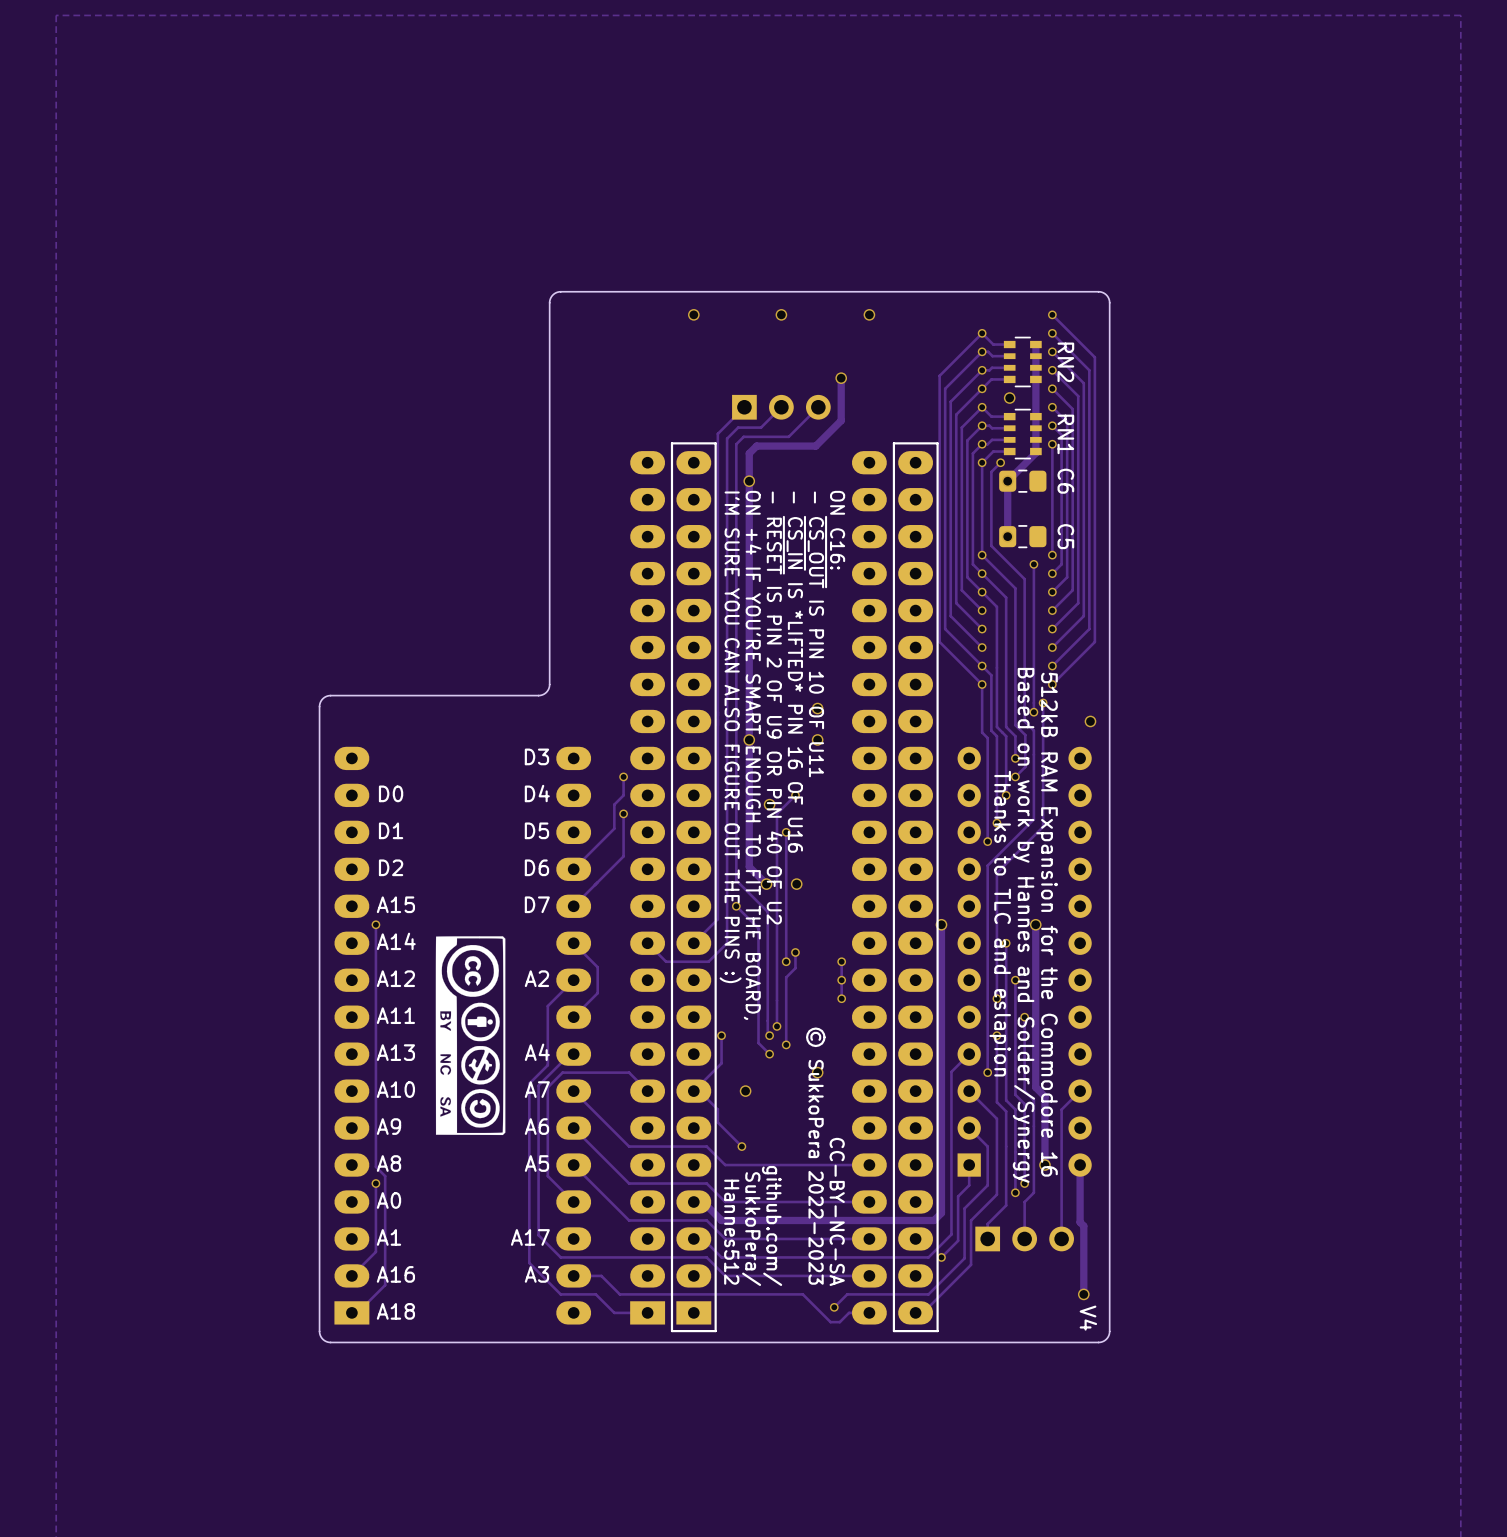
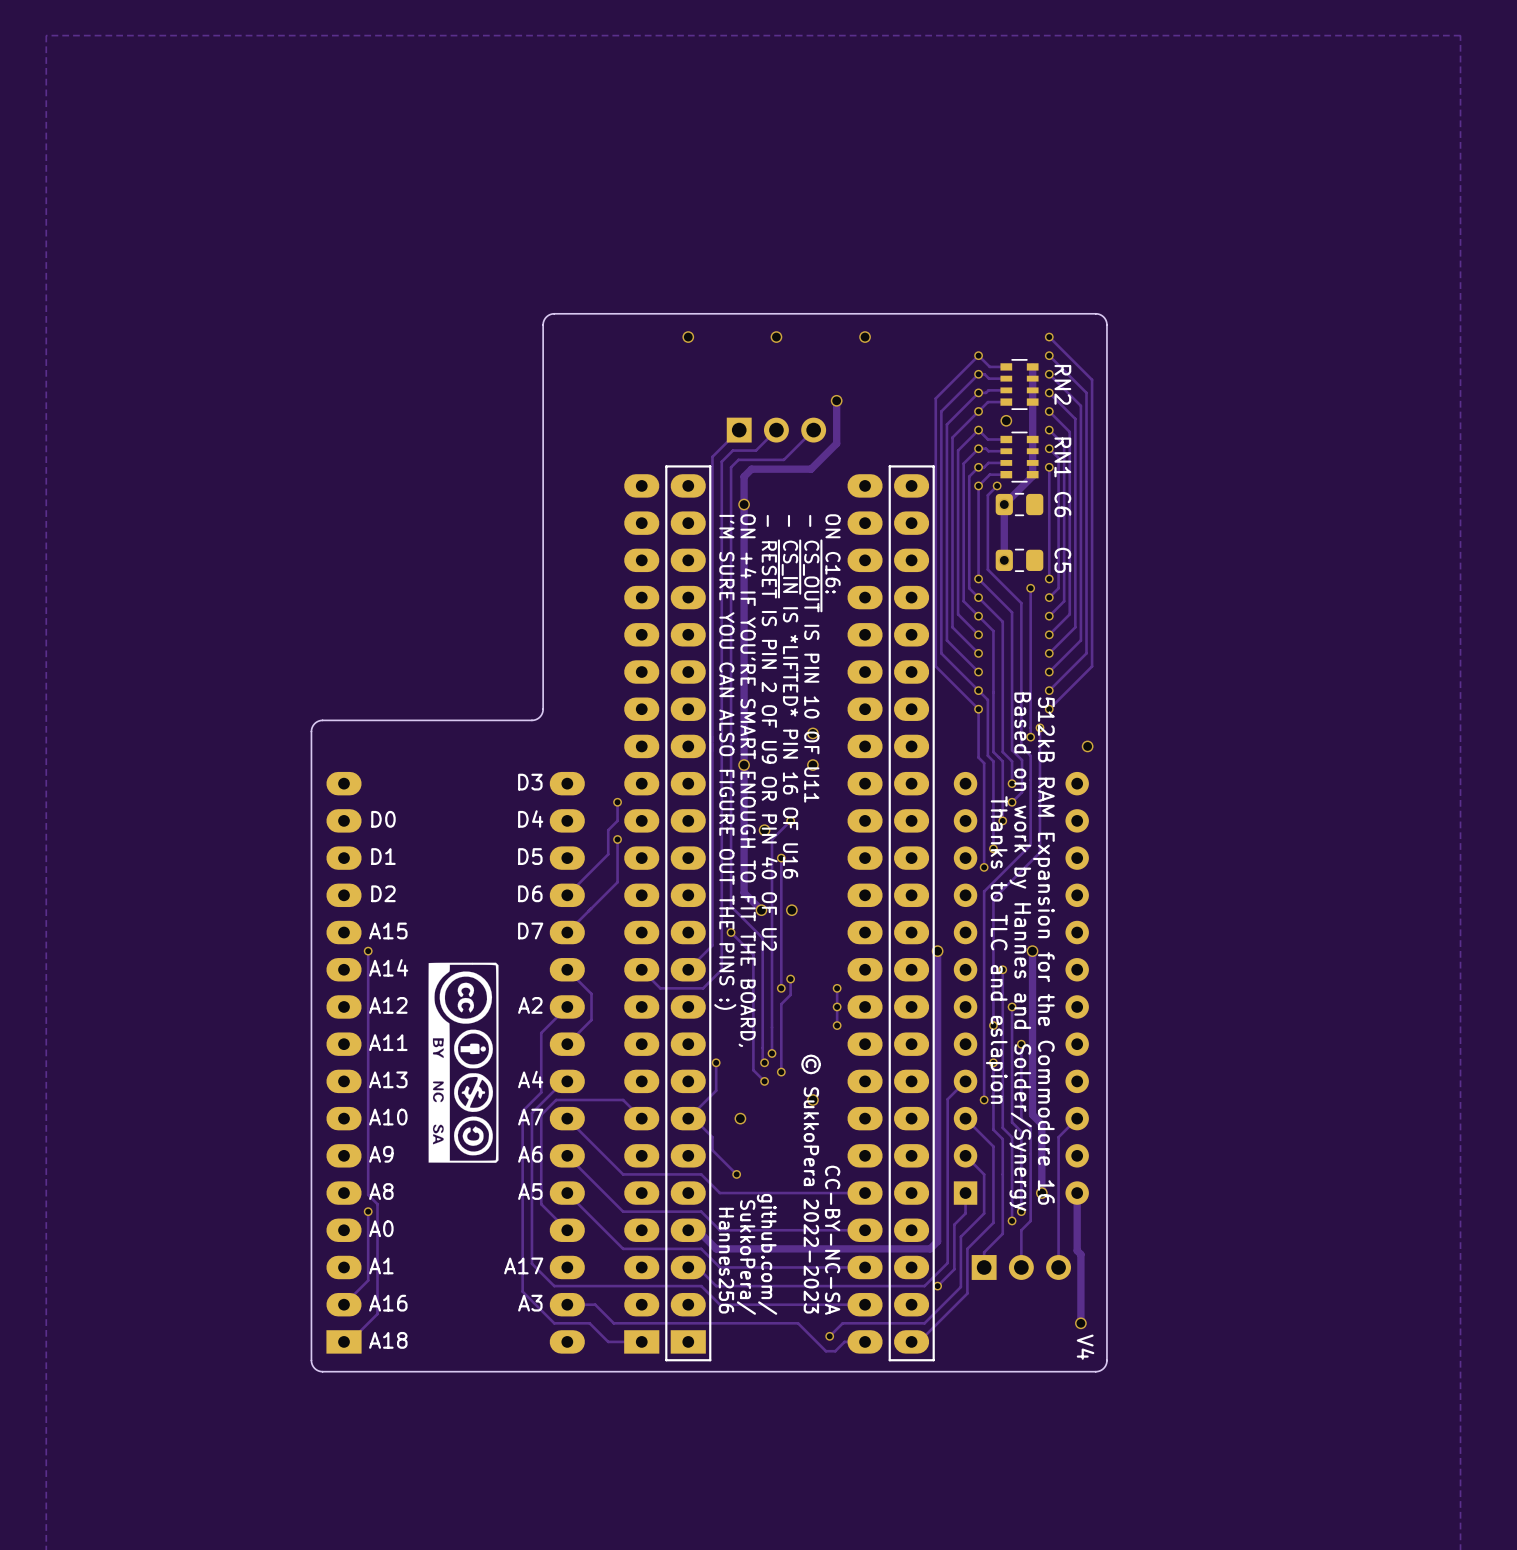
text: Hannes512 (731, 1232) -> Hannes256 (726, 1260)

